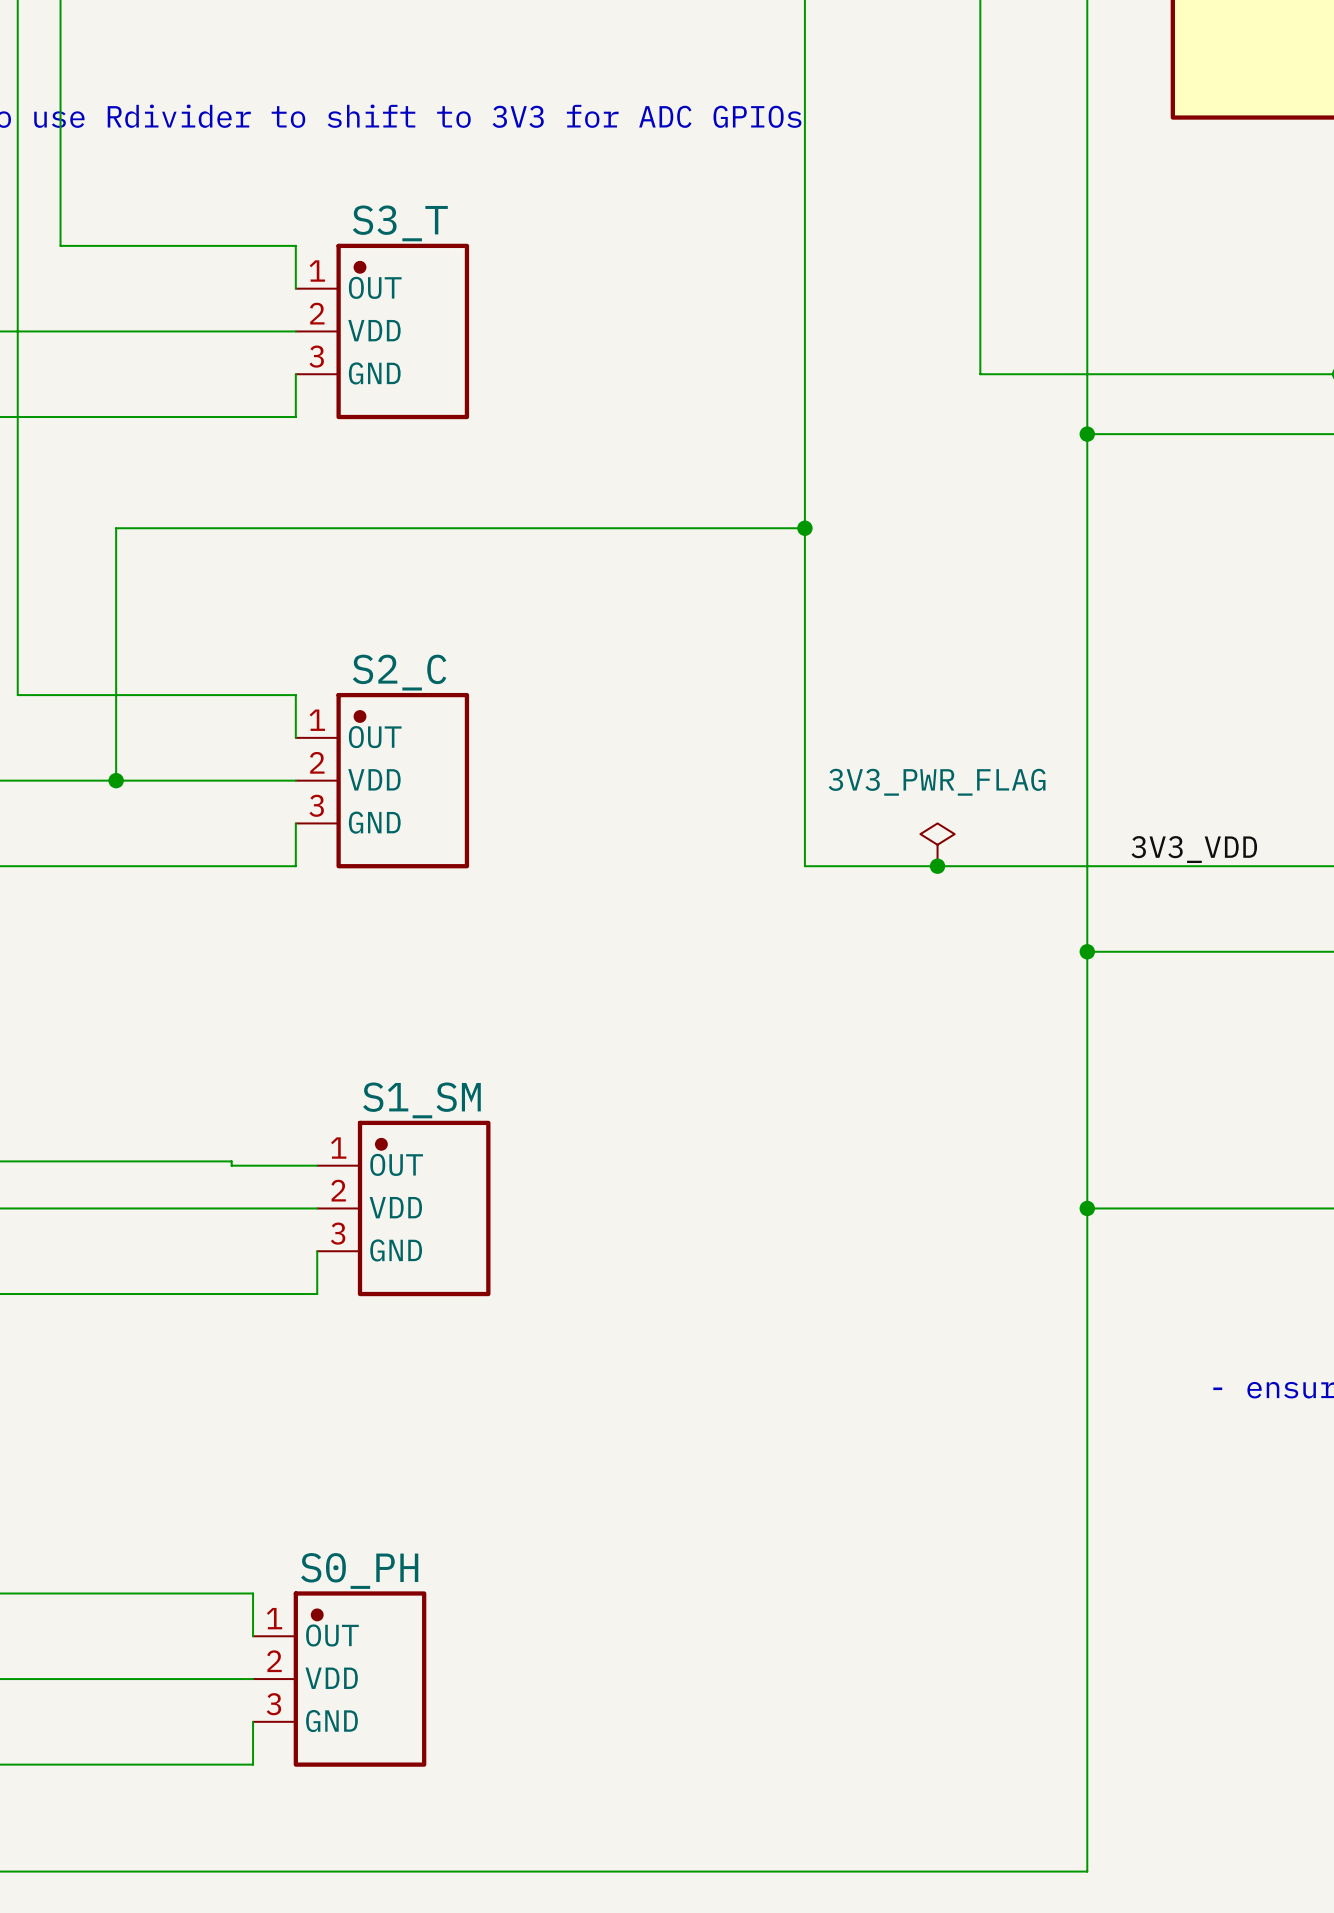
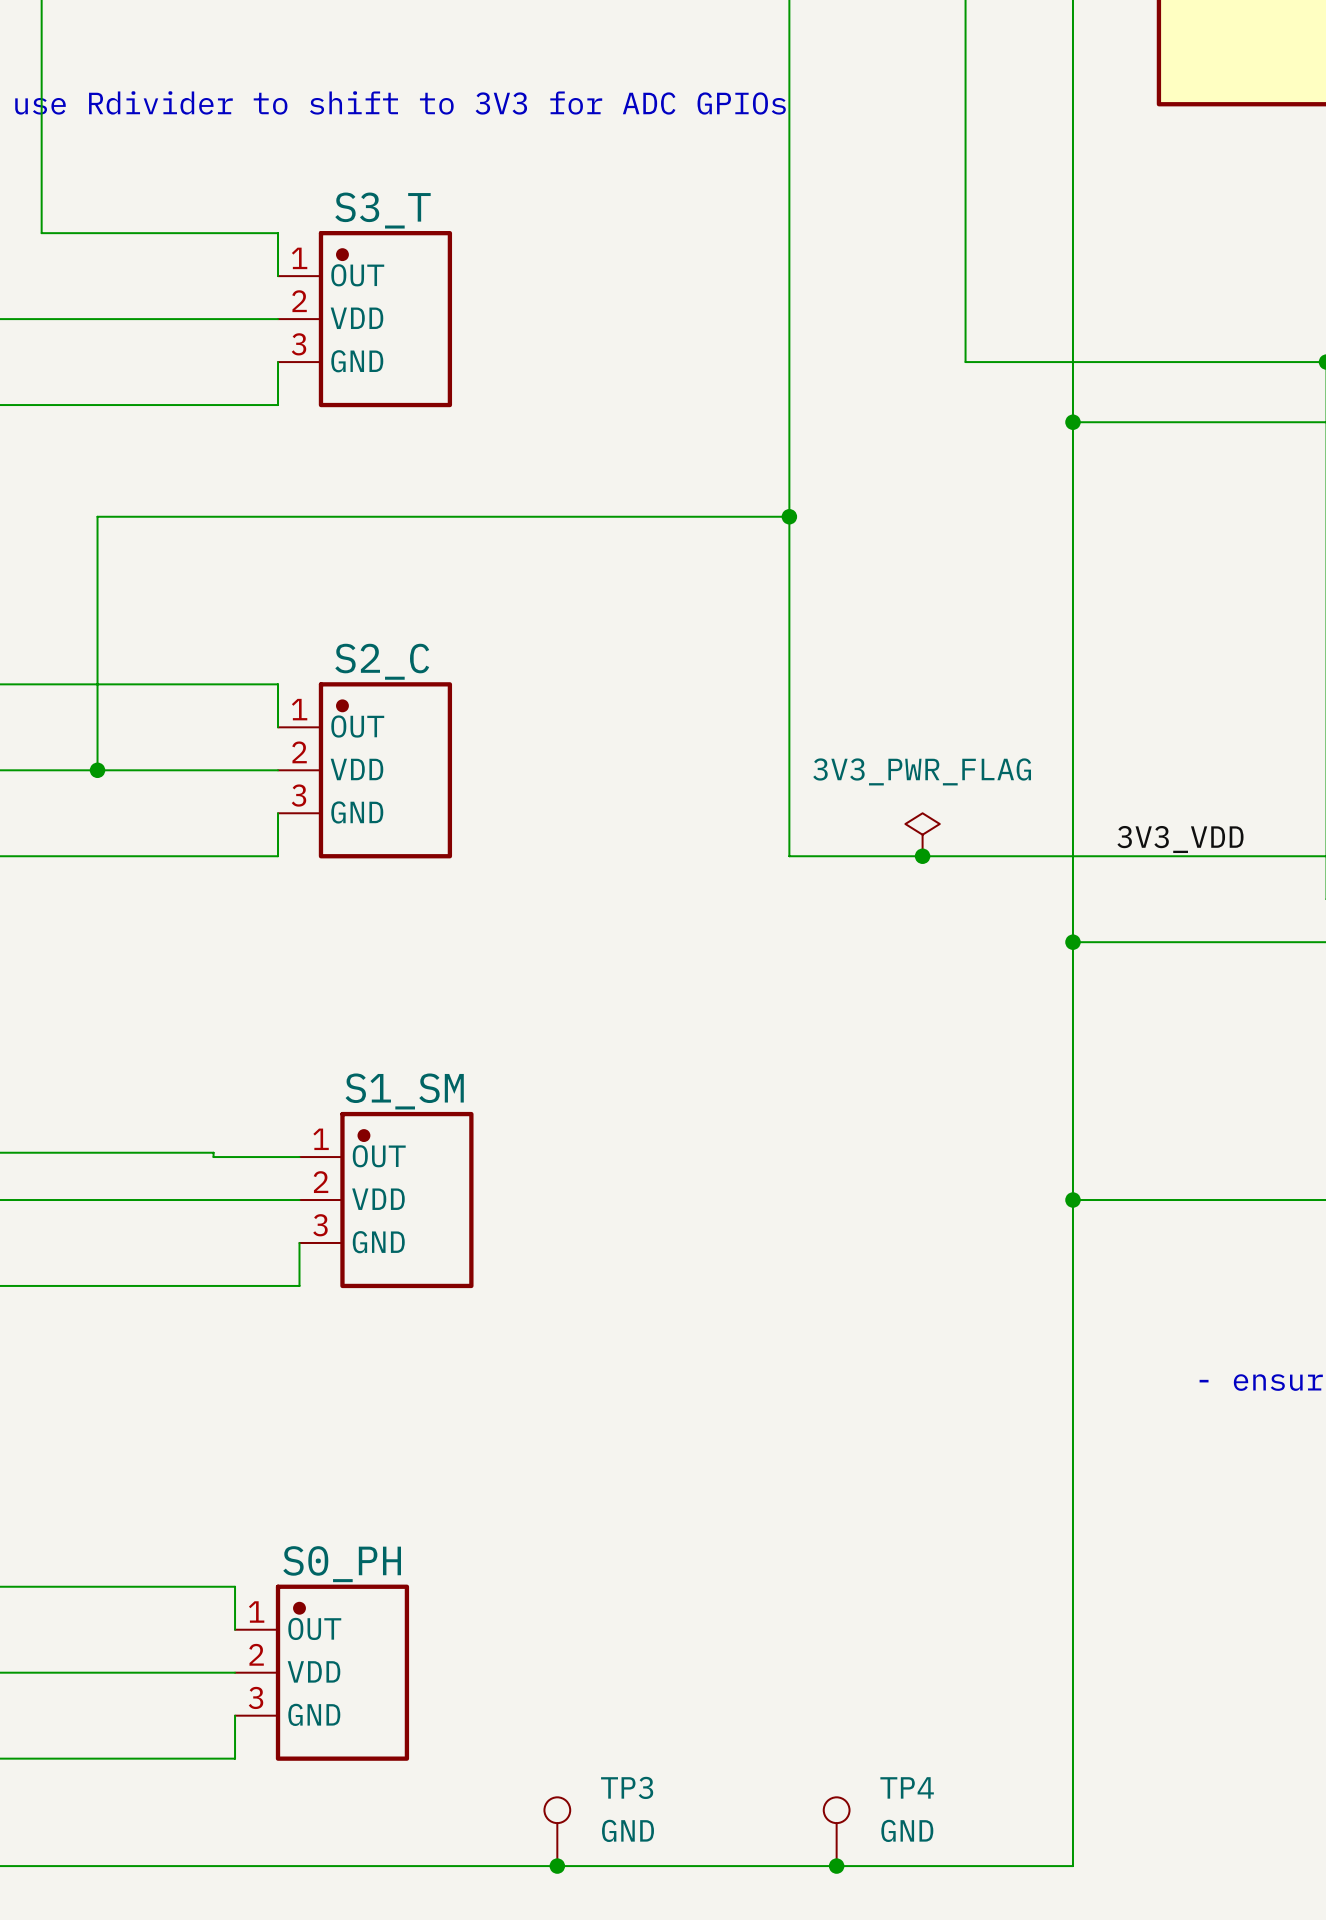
TP3: none -> GND (557, 1831)
TP4: none -> GND (836, 1831)
junction: none -> (557, 1866)
junction: none -> (836, 1866)

